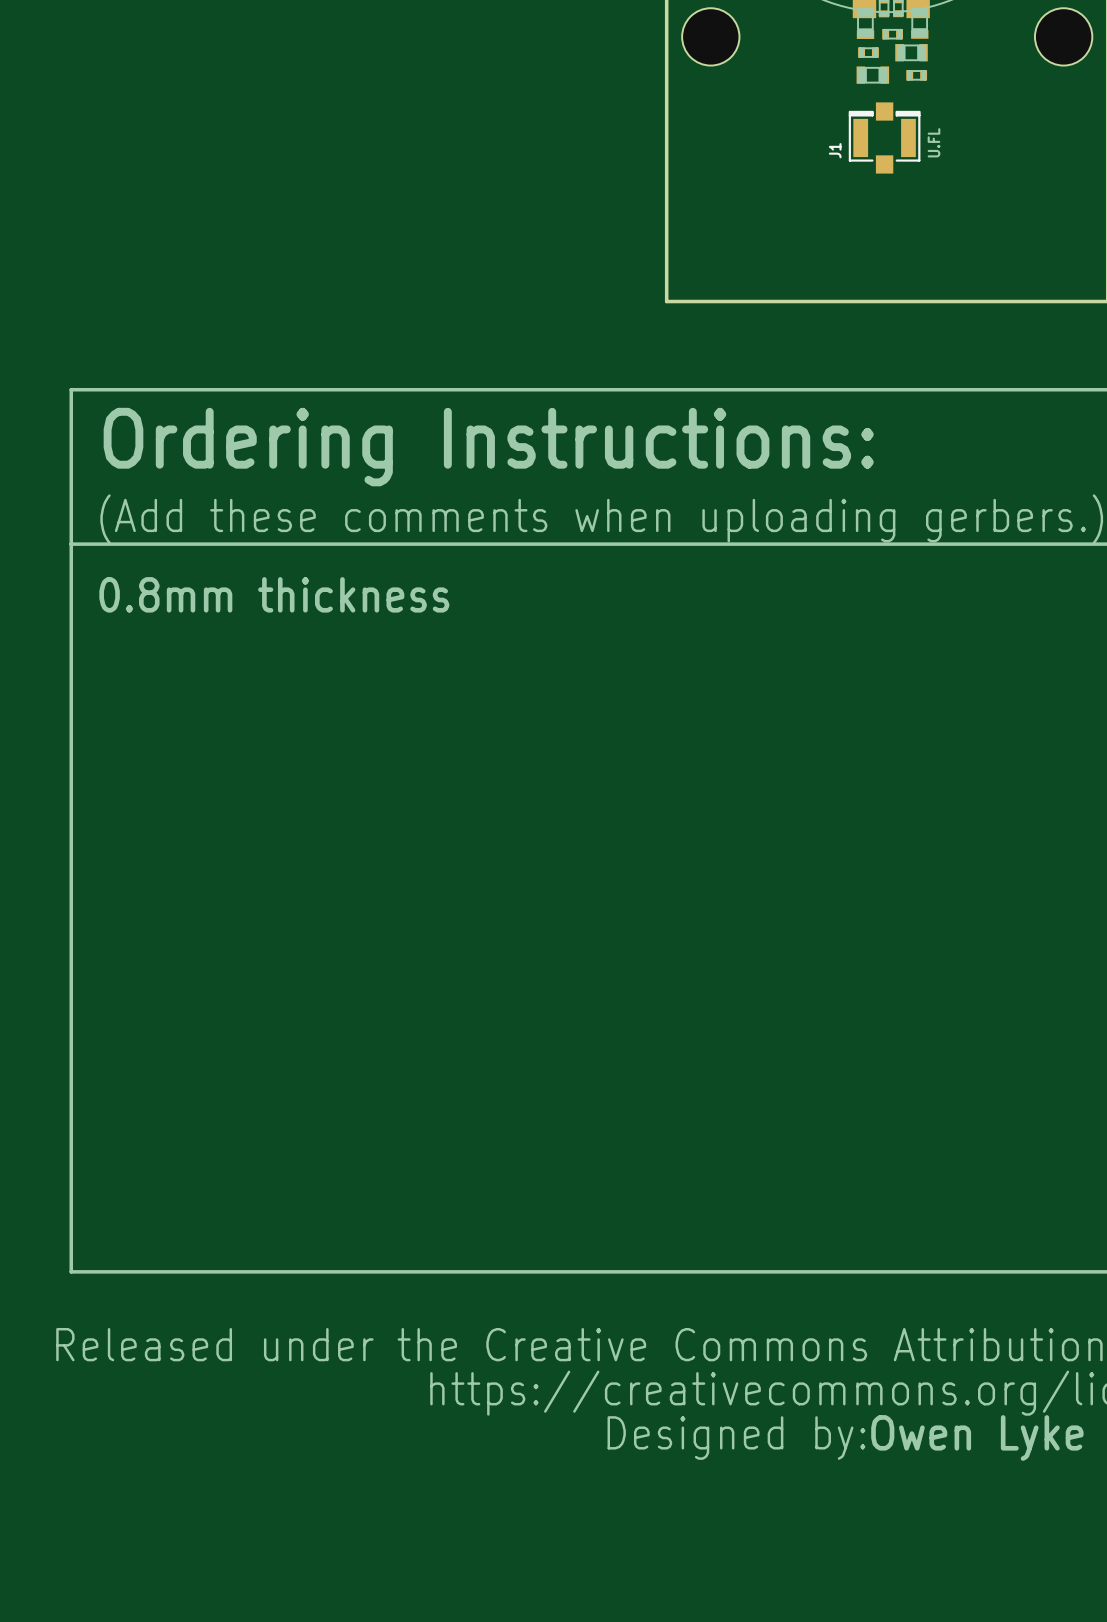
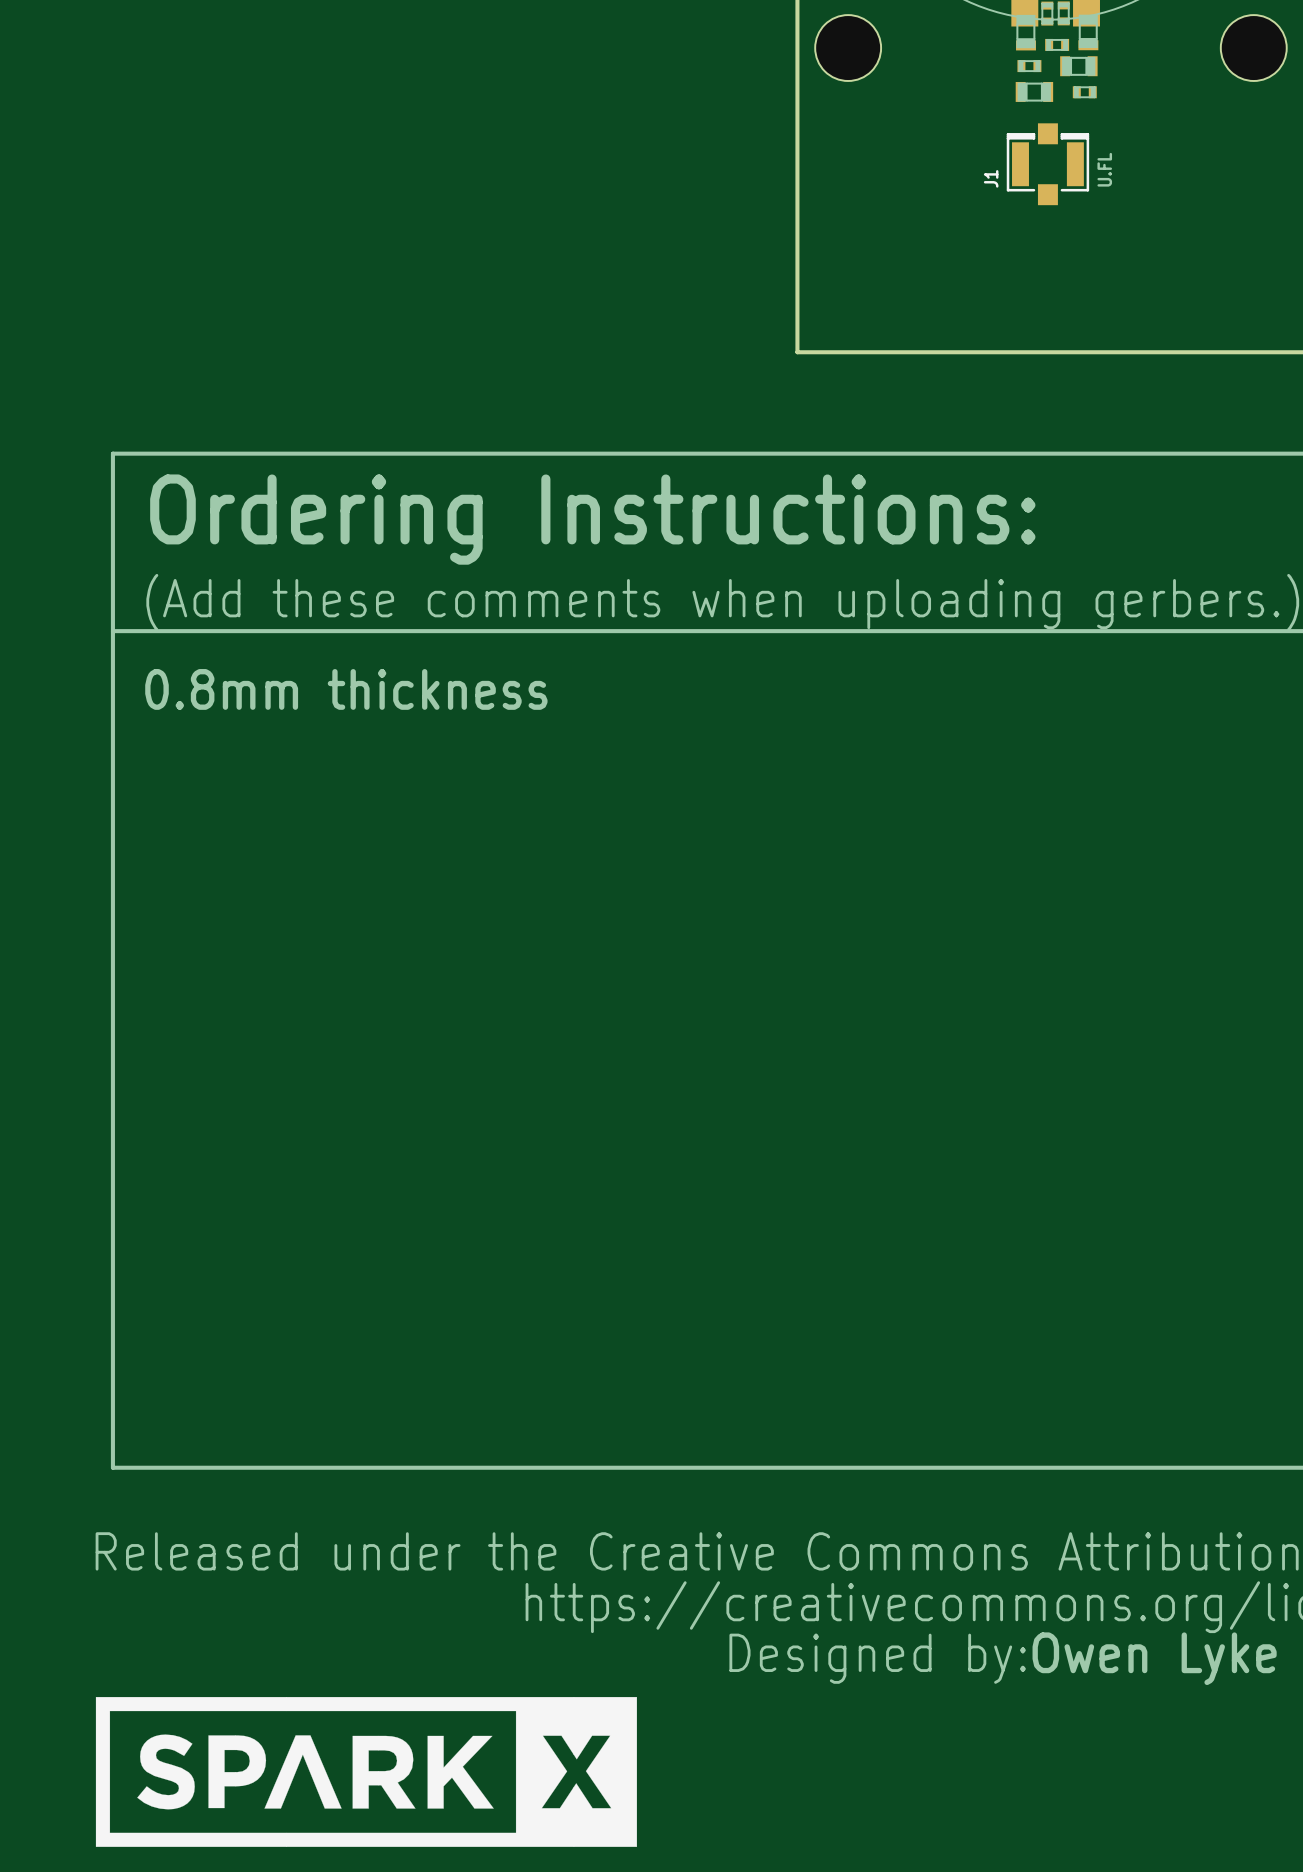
drawing: none -> [95, 1697, 637, 1847]

